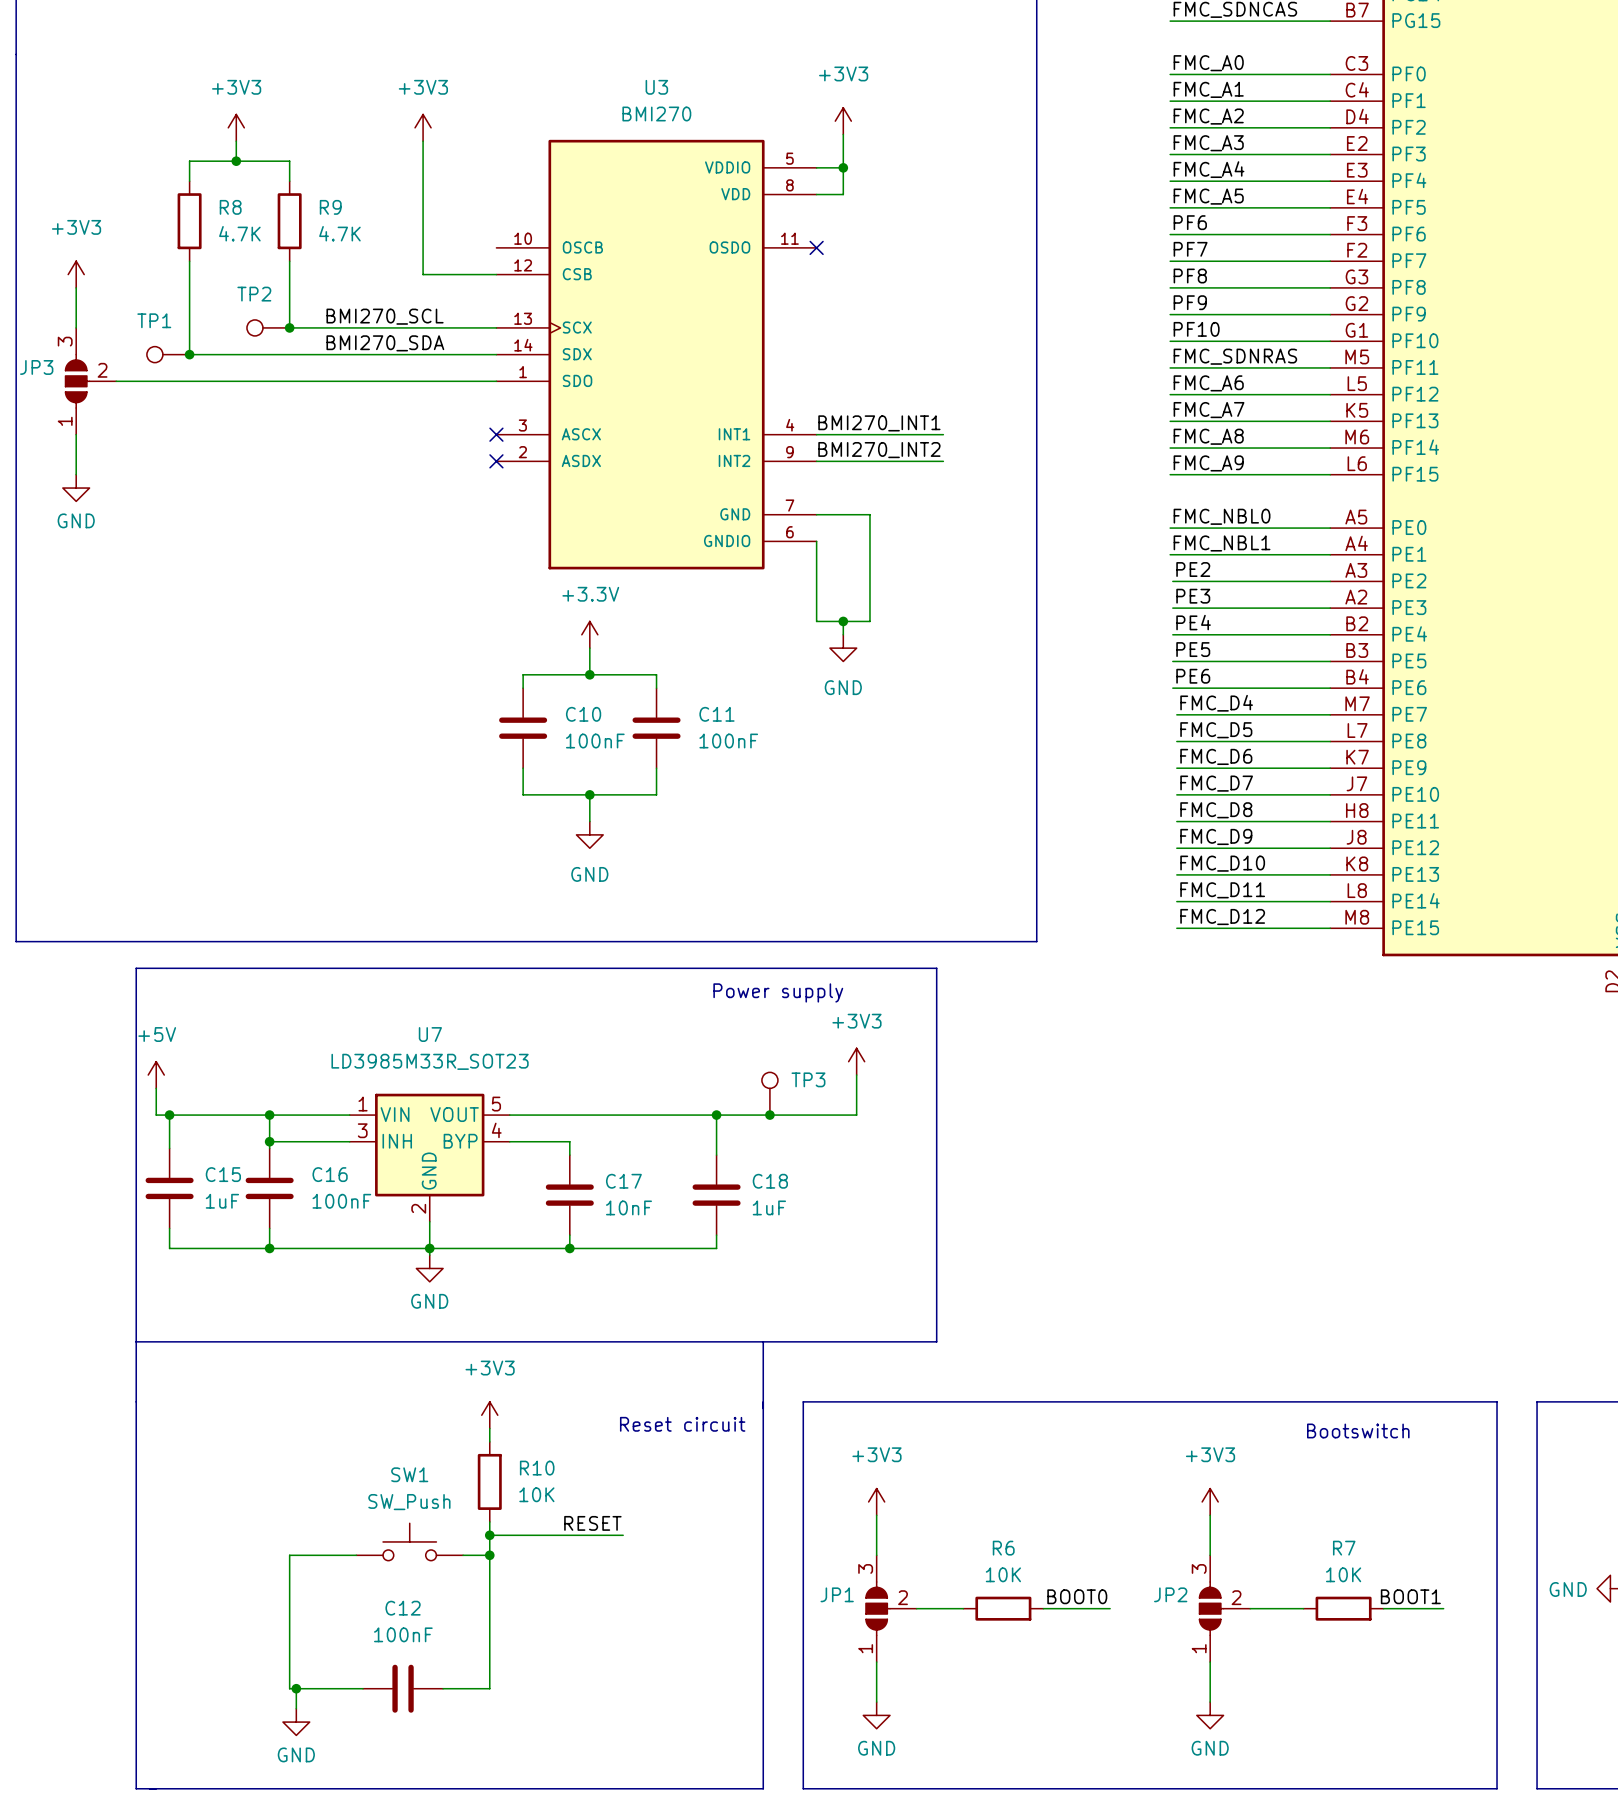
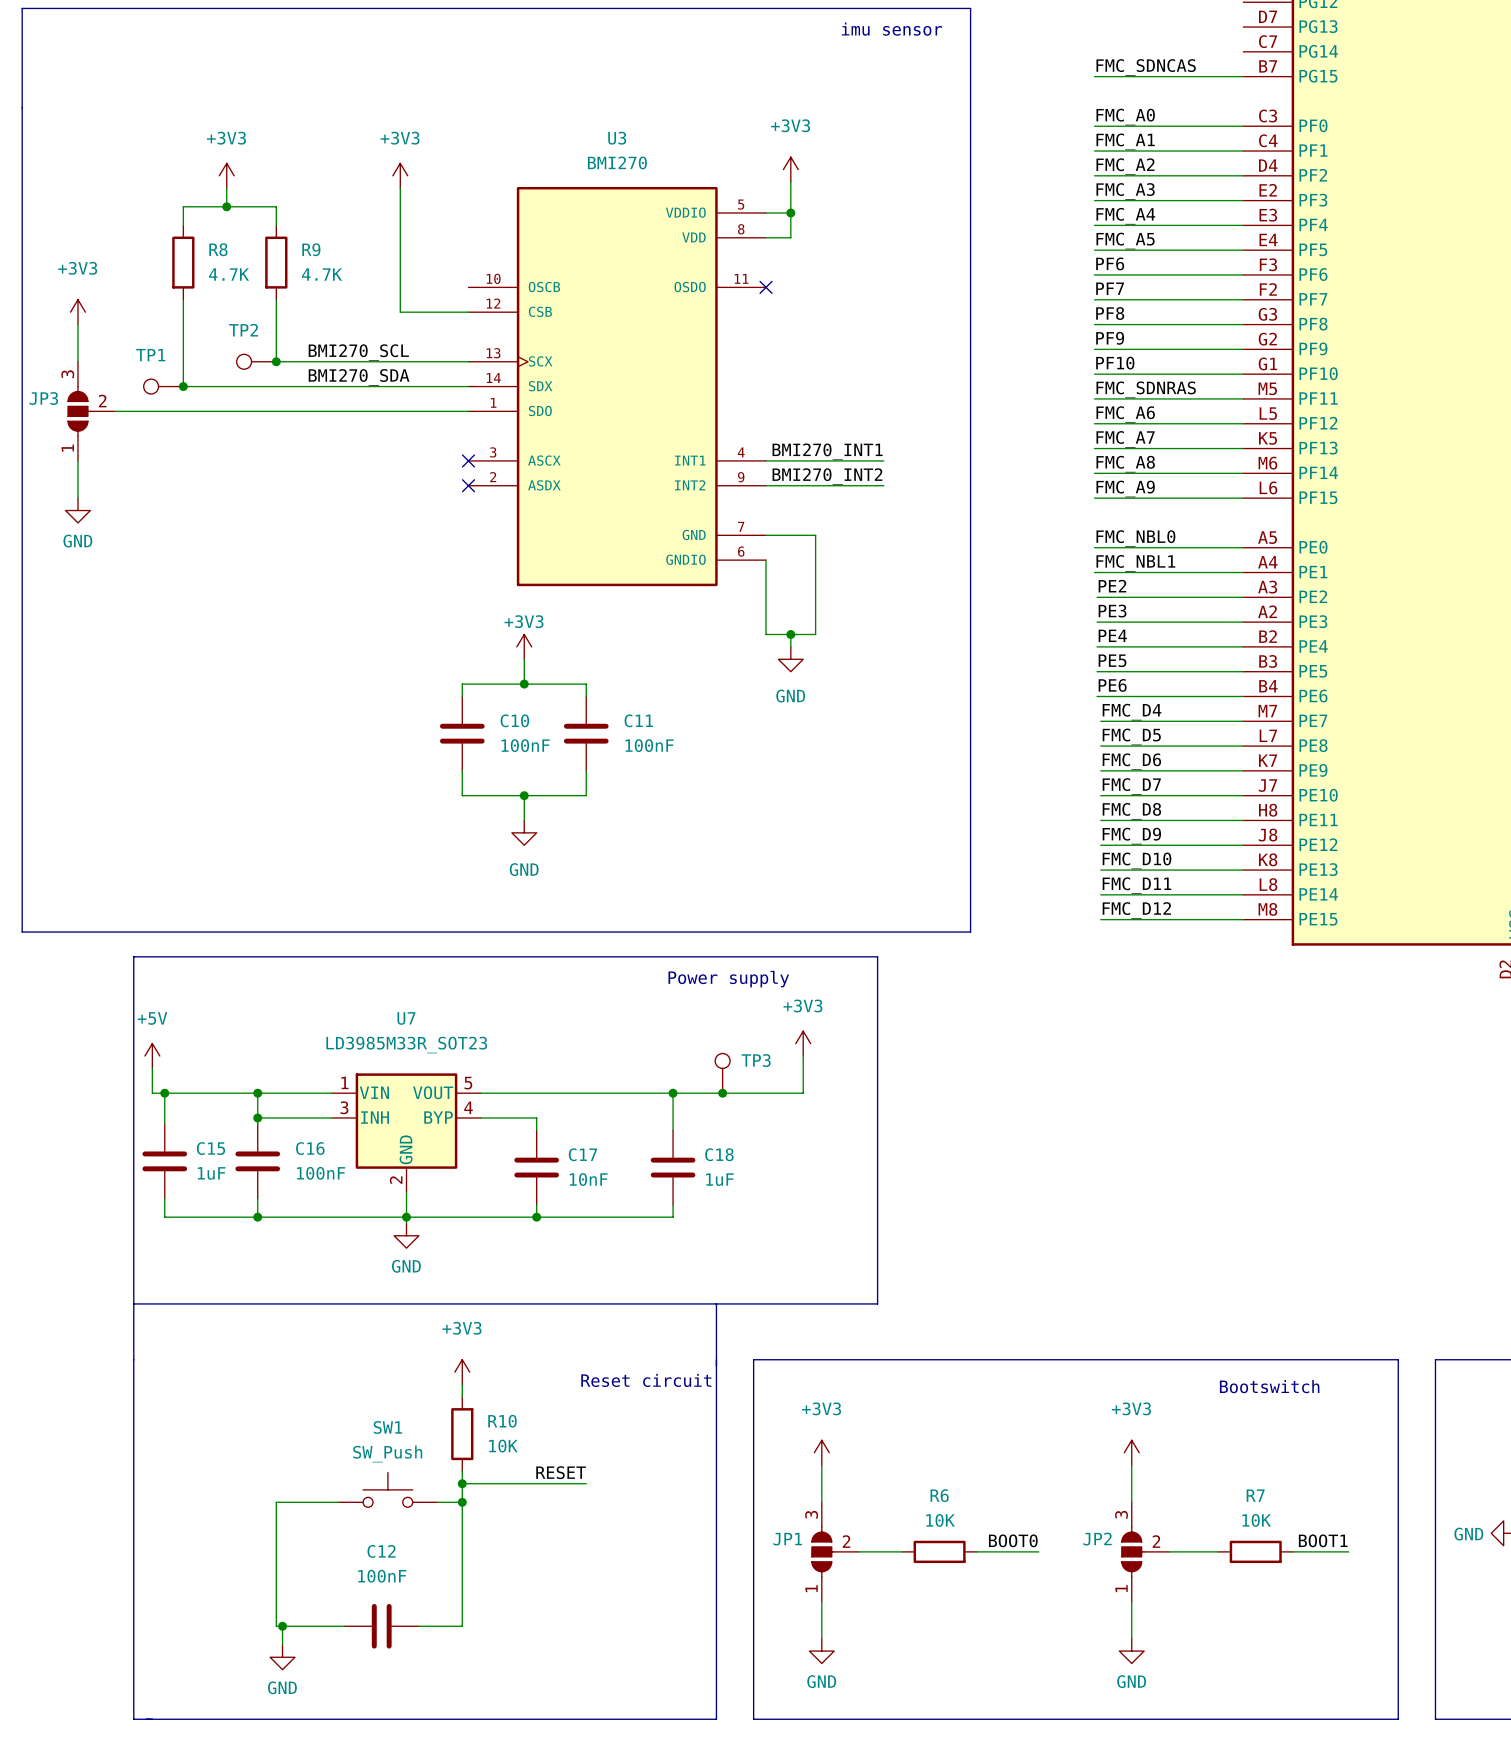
power symbol: none -> +3V3 (524, 646)
power symbol: +3.3V (589, 634) -> none
wire: (589, 648) (589, 674) -> (524, 659) (524, 684)
wire: (523, 674) (523, 688) -> (493, 684) (462, 684) (462, 696)
junction position: (589, 674) -> (524, 684)
wire: (623, 674) (656, 674) (656, 688) -> (586, 684) (586, 696)
C10 position: (523, 728) -> (462, 733)
C11 position: (656, 728) -> (586, 733)
wire: (523, 768) (523, 794) -> (462, 770) (462, 795) (493, 795)
wire: (656, 768) (656, 794) (623, 794) -> (586, 770) (586, 795)
wire: (589, 794) (589, 821) -> (524, 795) (524, 820)
junction position: (589, 794) -> (524, 795)
power symbol position: GND (589, 834) -> GND (524, 832)

